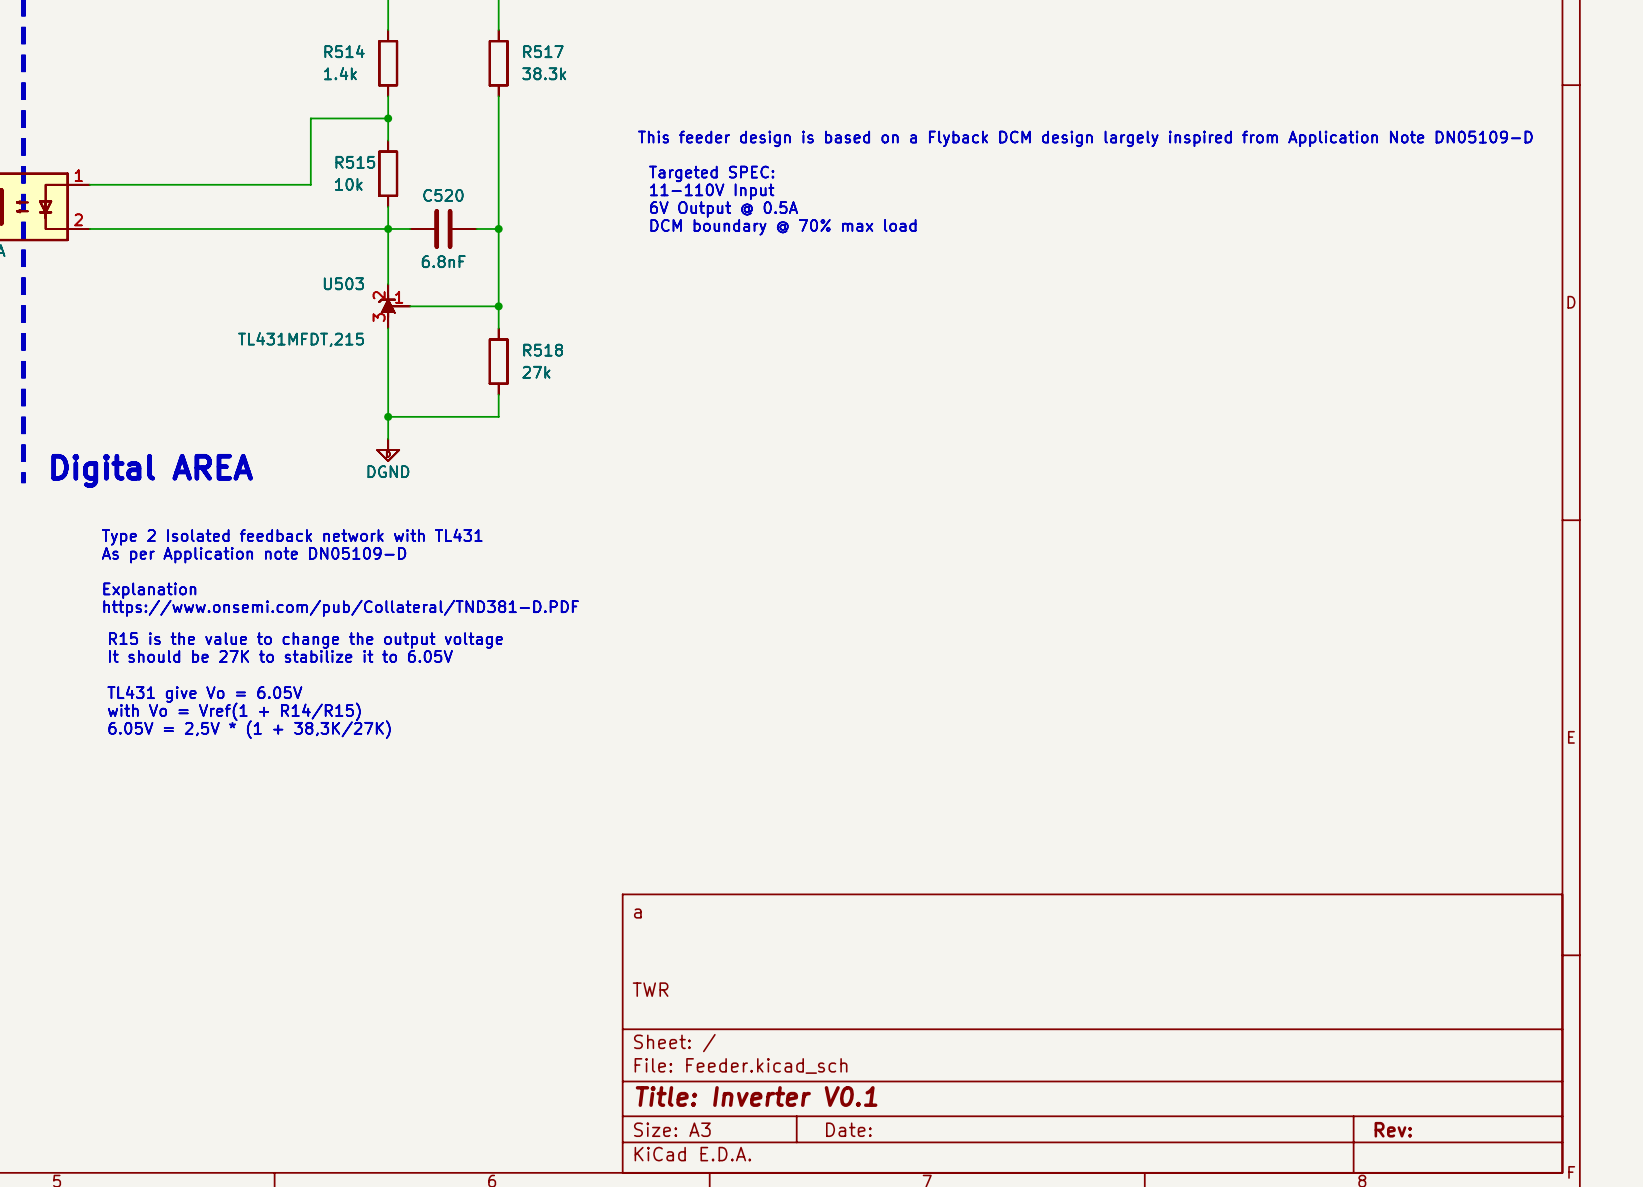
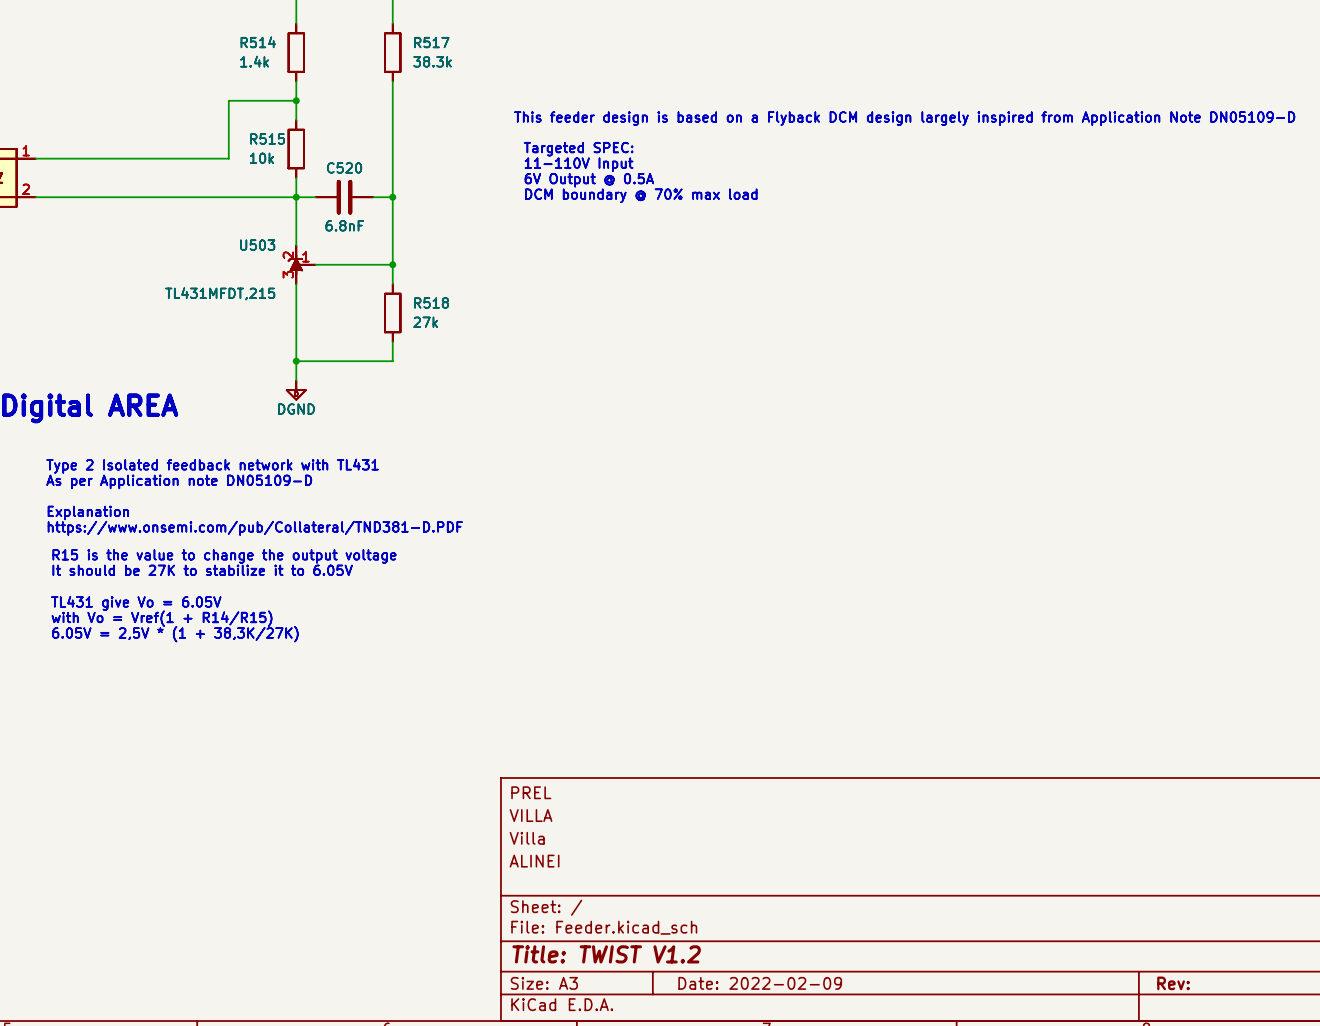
title block: a (637, 913) -> PREL (531, 792)
title block: none -> VILLA (531, 815)
title block: none -> Villa (527, 838)
title block: TWR (650, 989) -> ALINEI (534, 861)
title block: Title: Inverter V0.1 (756, 1096) -> Title: TWIST V1.2 (606, 954)
title block: Date: (848, 1129) -> Date: 2022-02-09 (760, 983)

